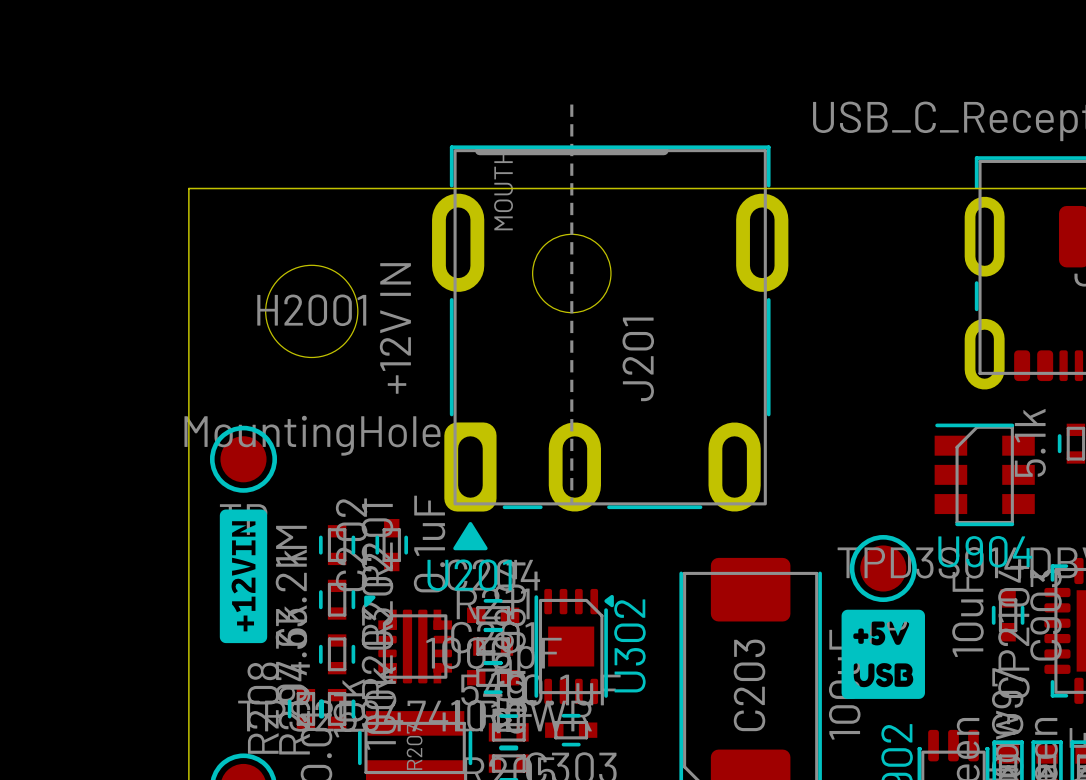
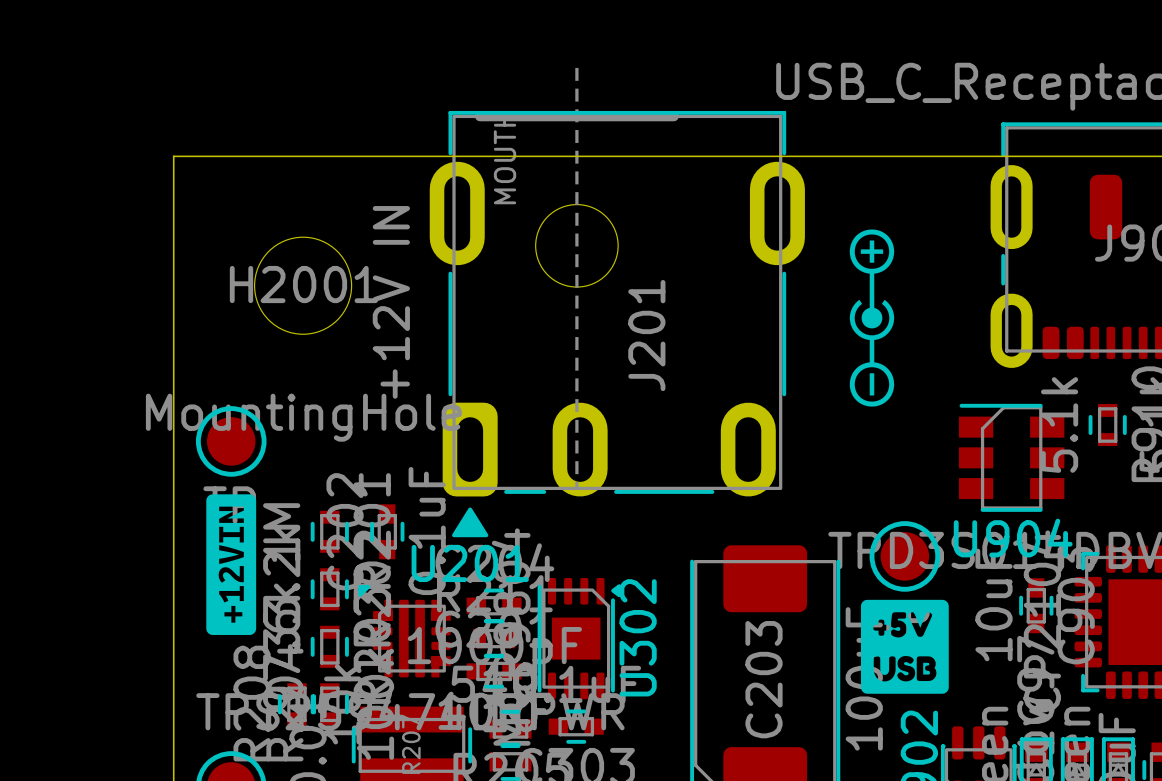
drawing: none -> [849, 229, 895, 407]

